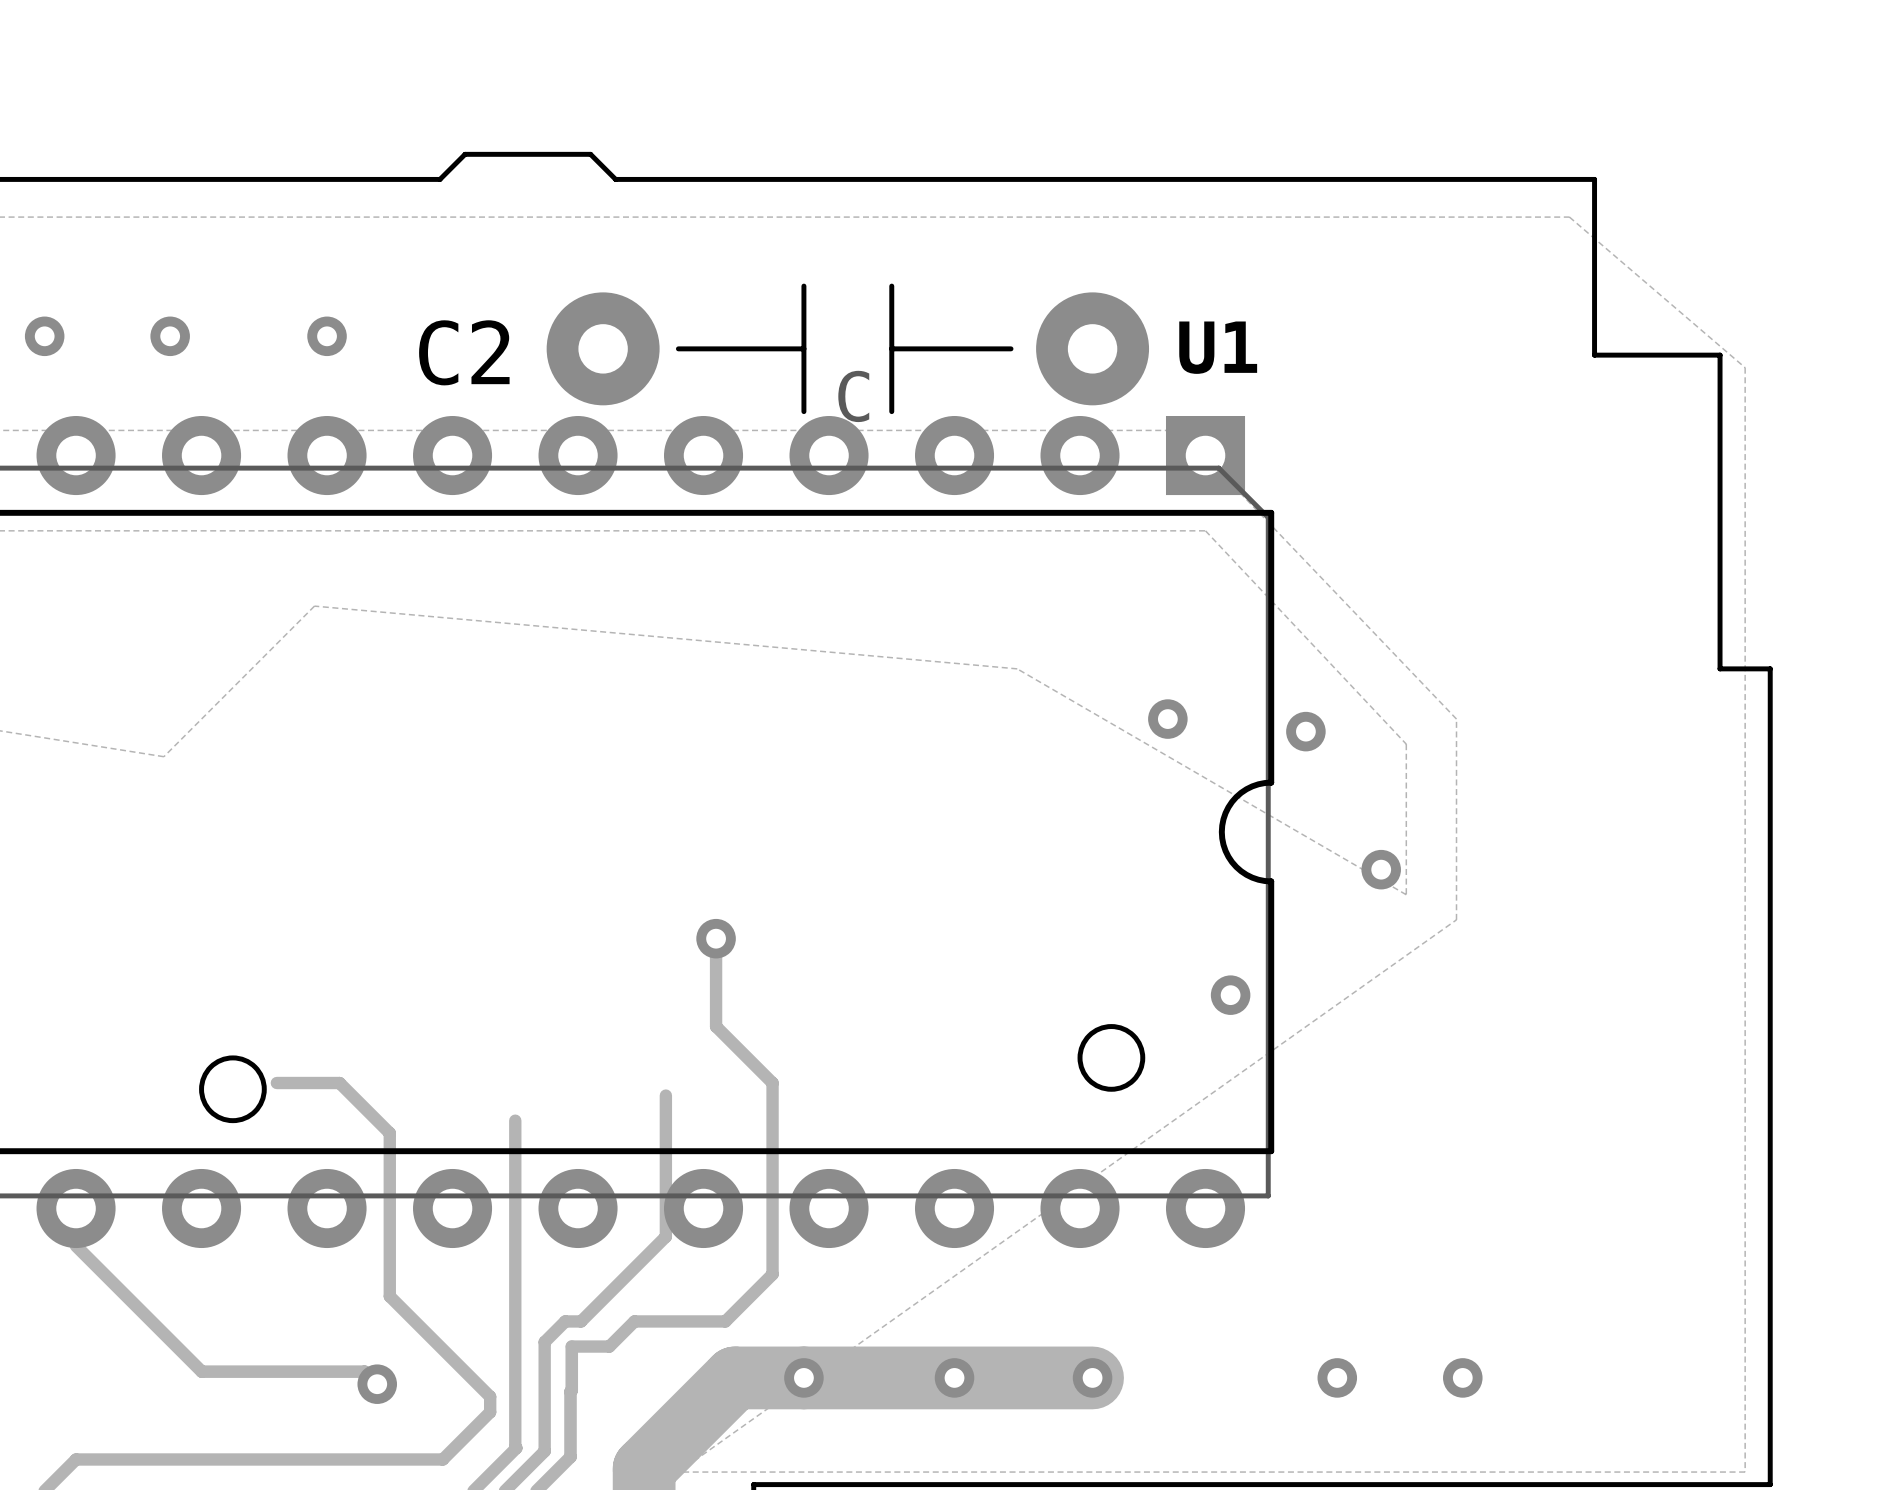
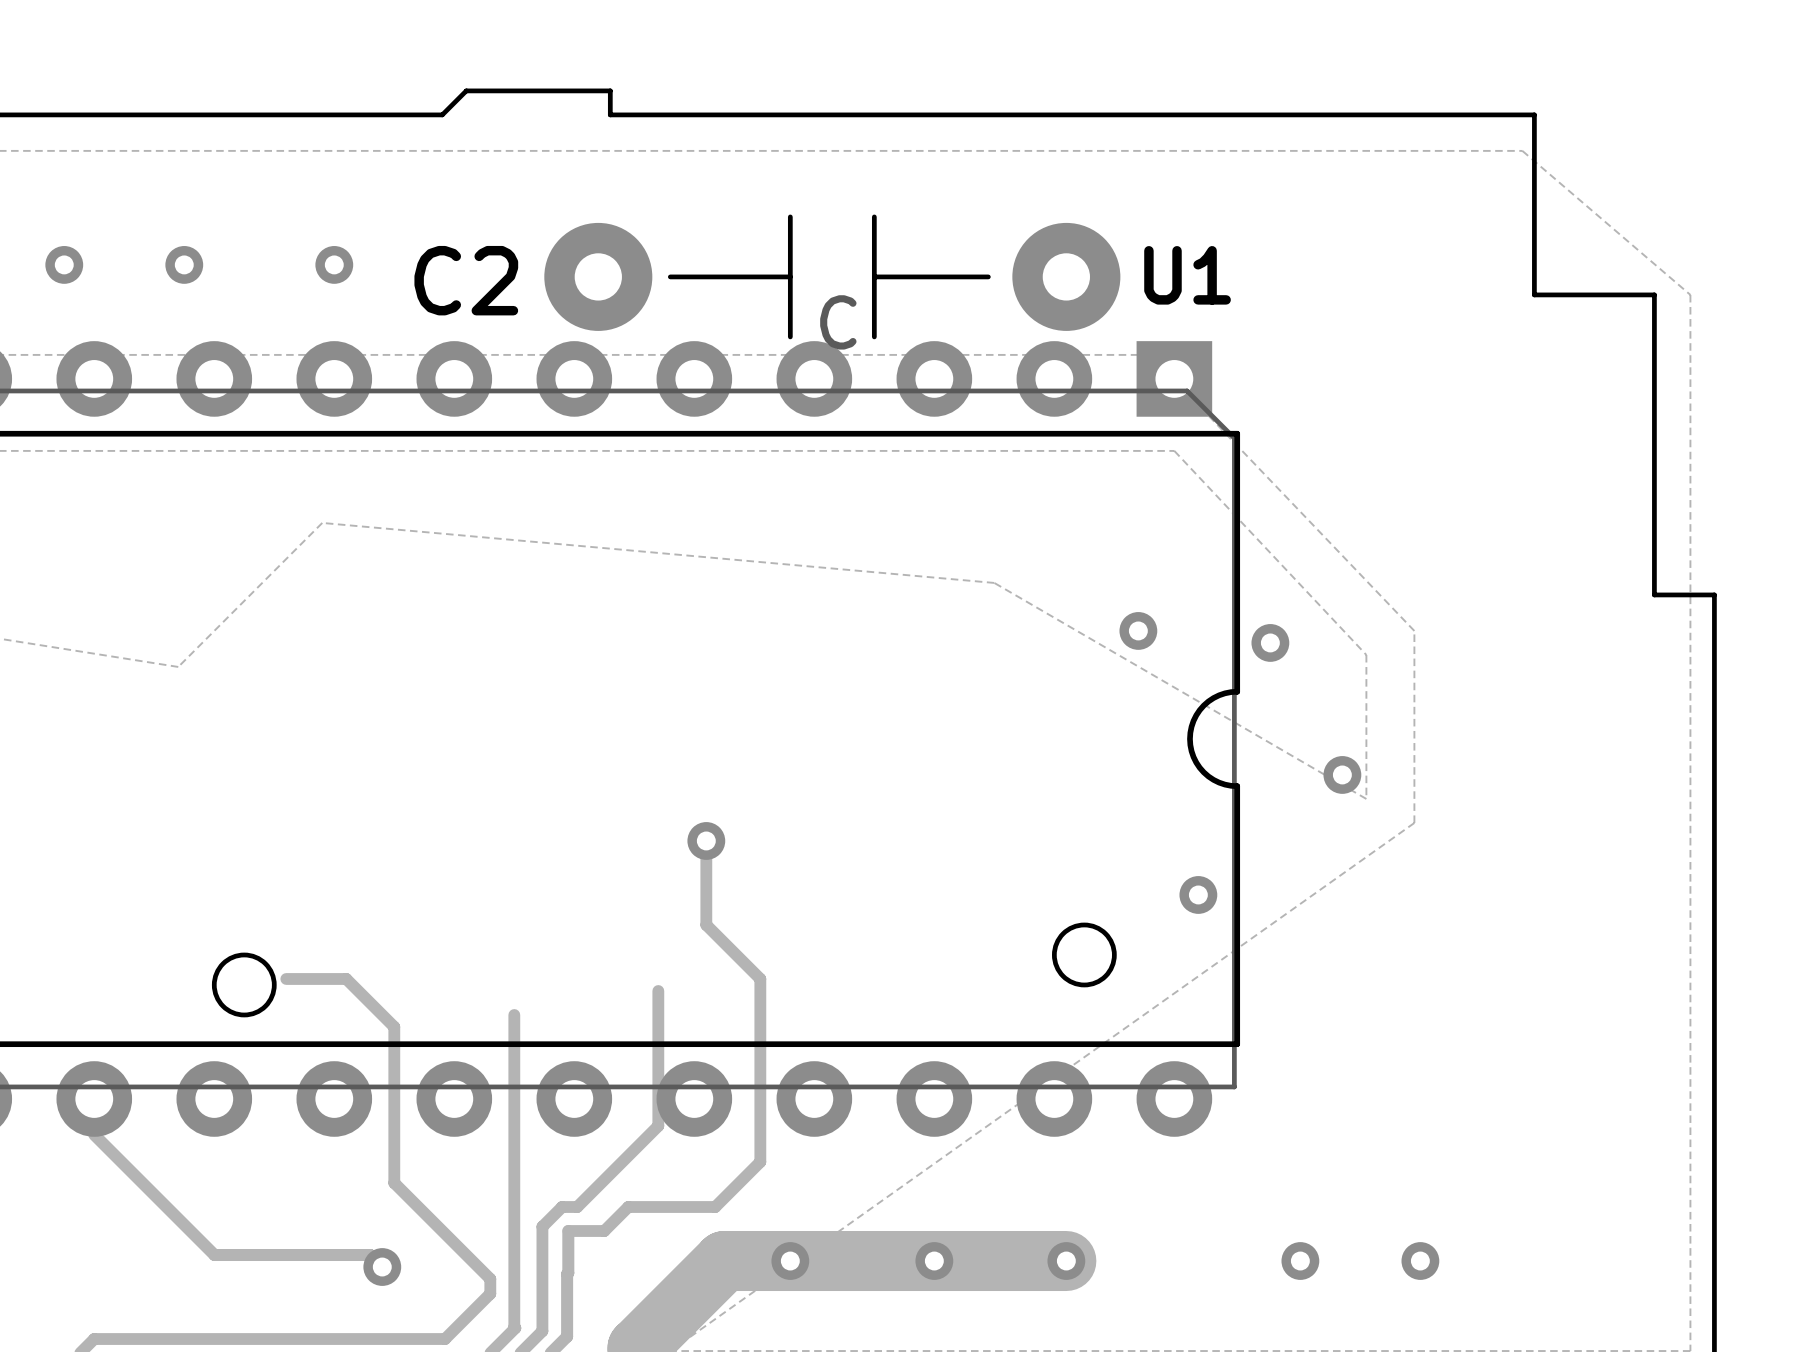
board edge: (590, 154) (615, 179) -> (586, 90) (610, 90) (610, 114)
board edge: (1582, 179) (1594, 179) (1594, 355) (1720, 355) (1720, 668) (1770, 668) (1770, 681) -> (1534, 114) (1534, 294) (1654, 294) (1654, 594) (1714, 594)

